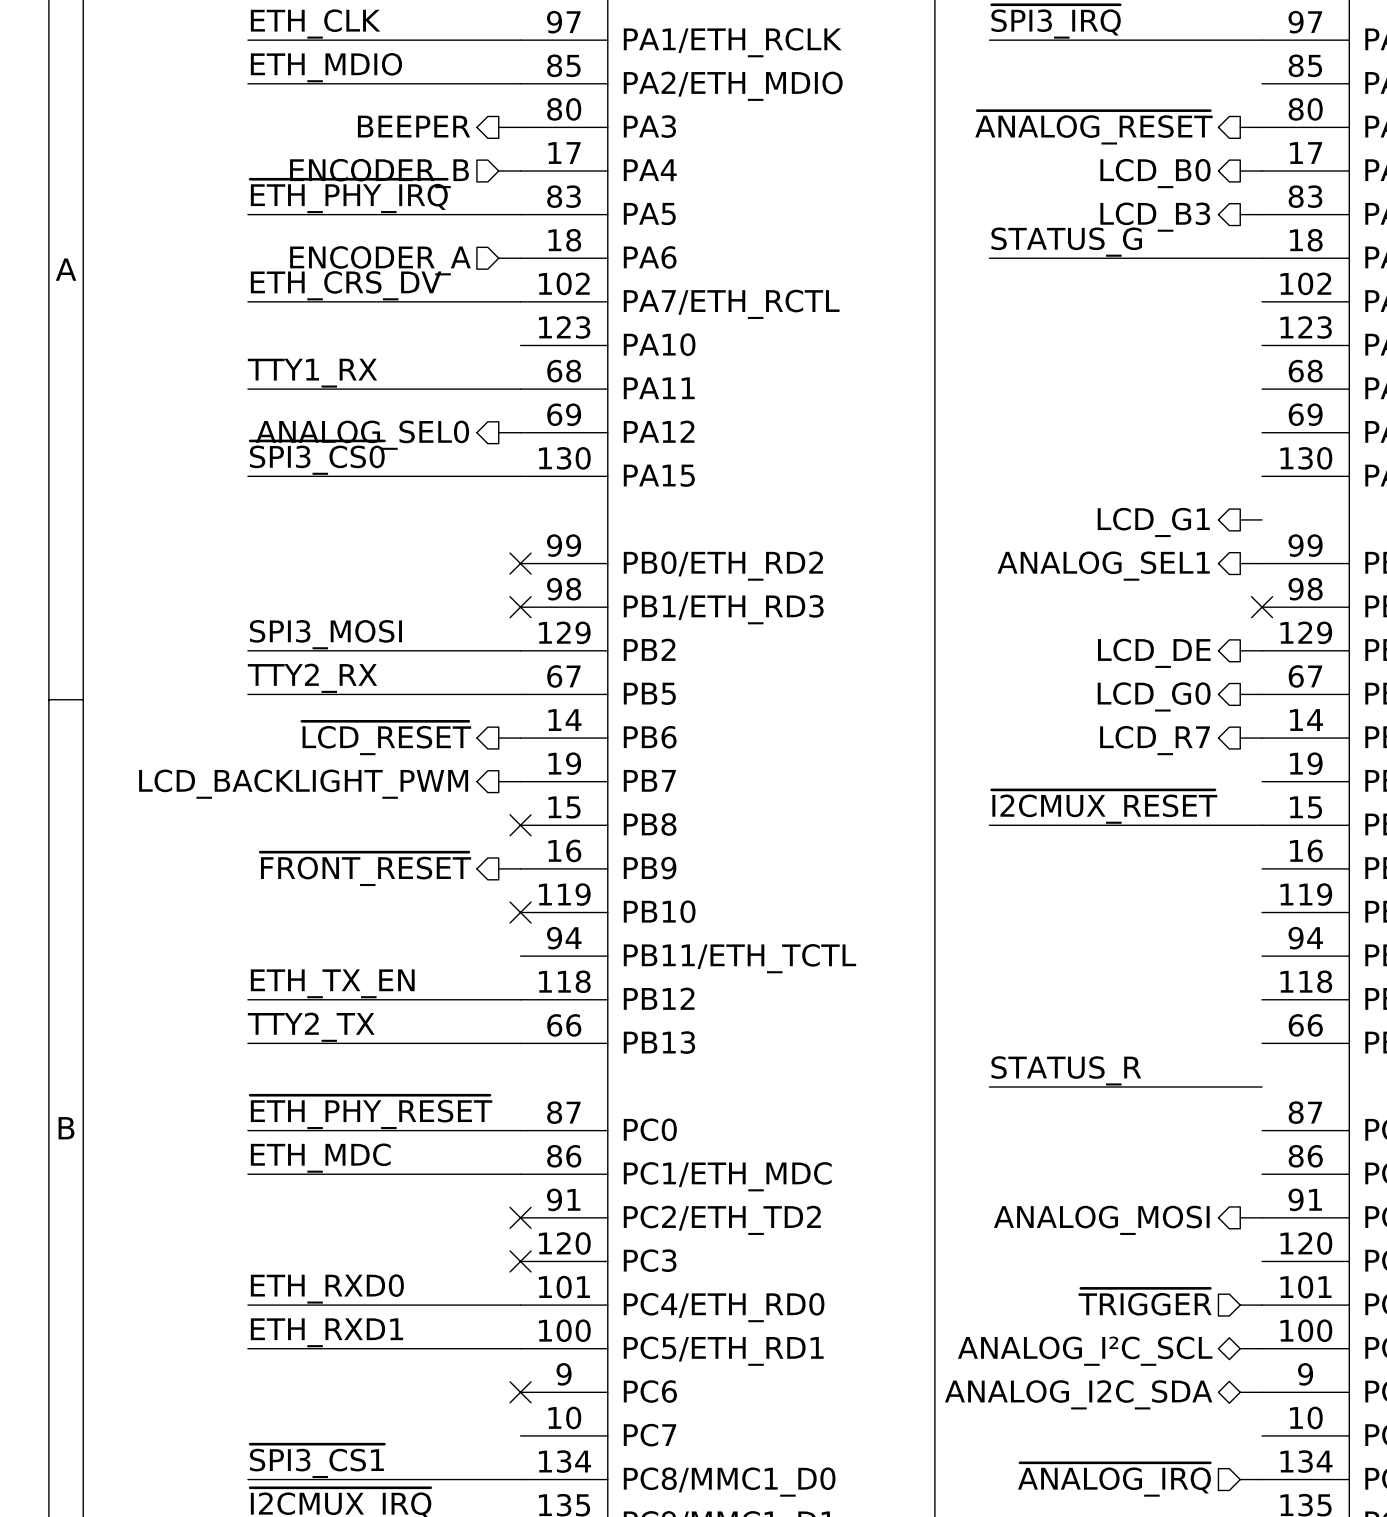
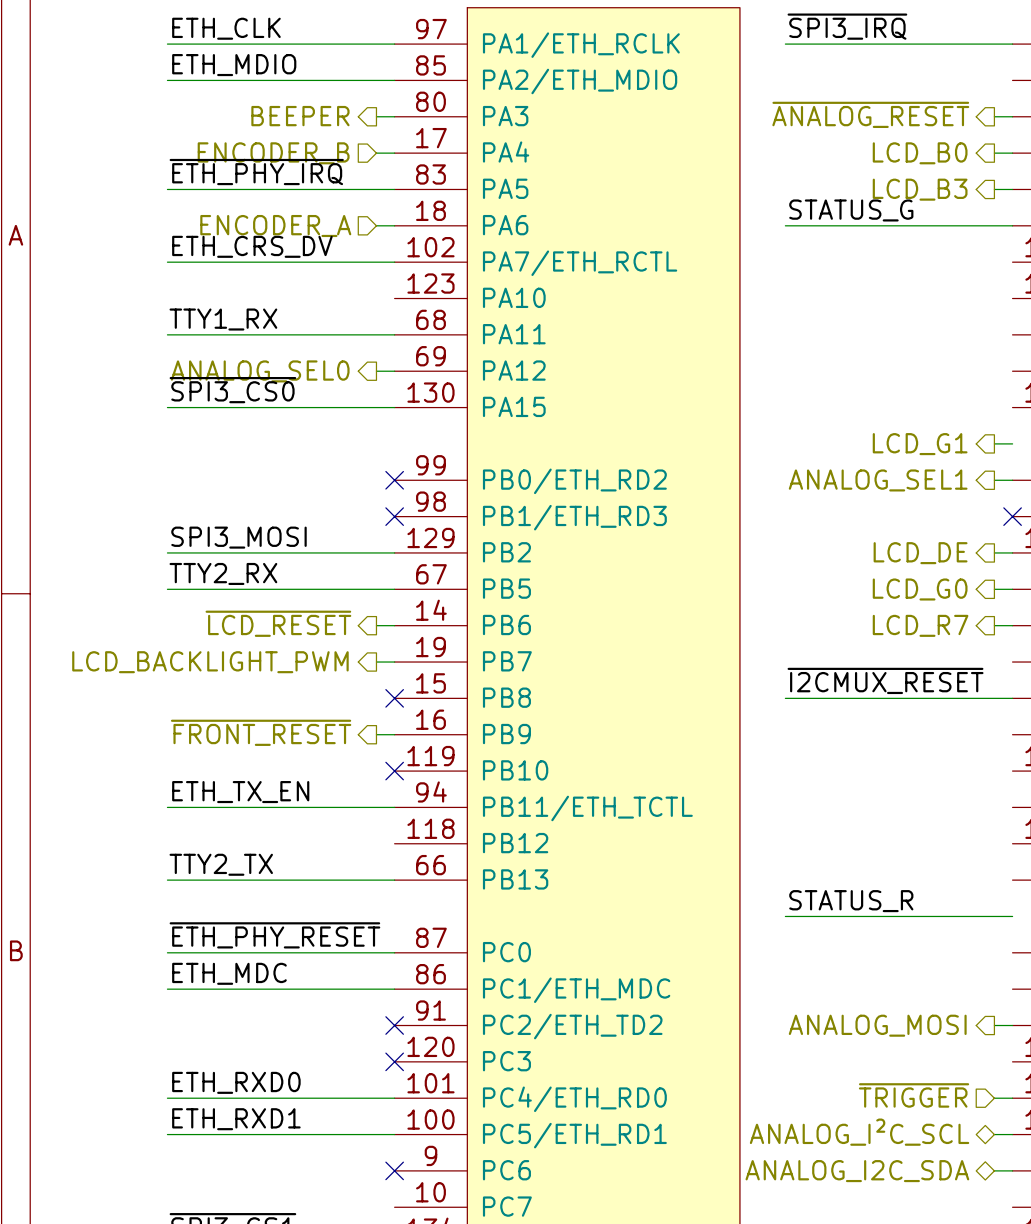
label position: ETH_TX_EN (332, 983) -> ETH_TX_EN (240, 792)
wire: (247, 999) (520, 999) -> (167, 807) (394, 807)

